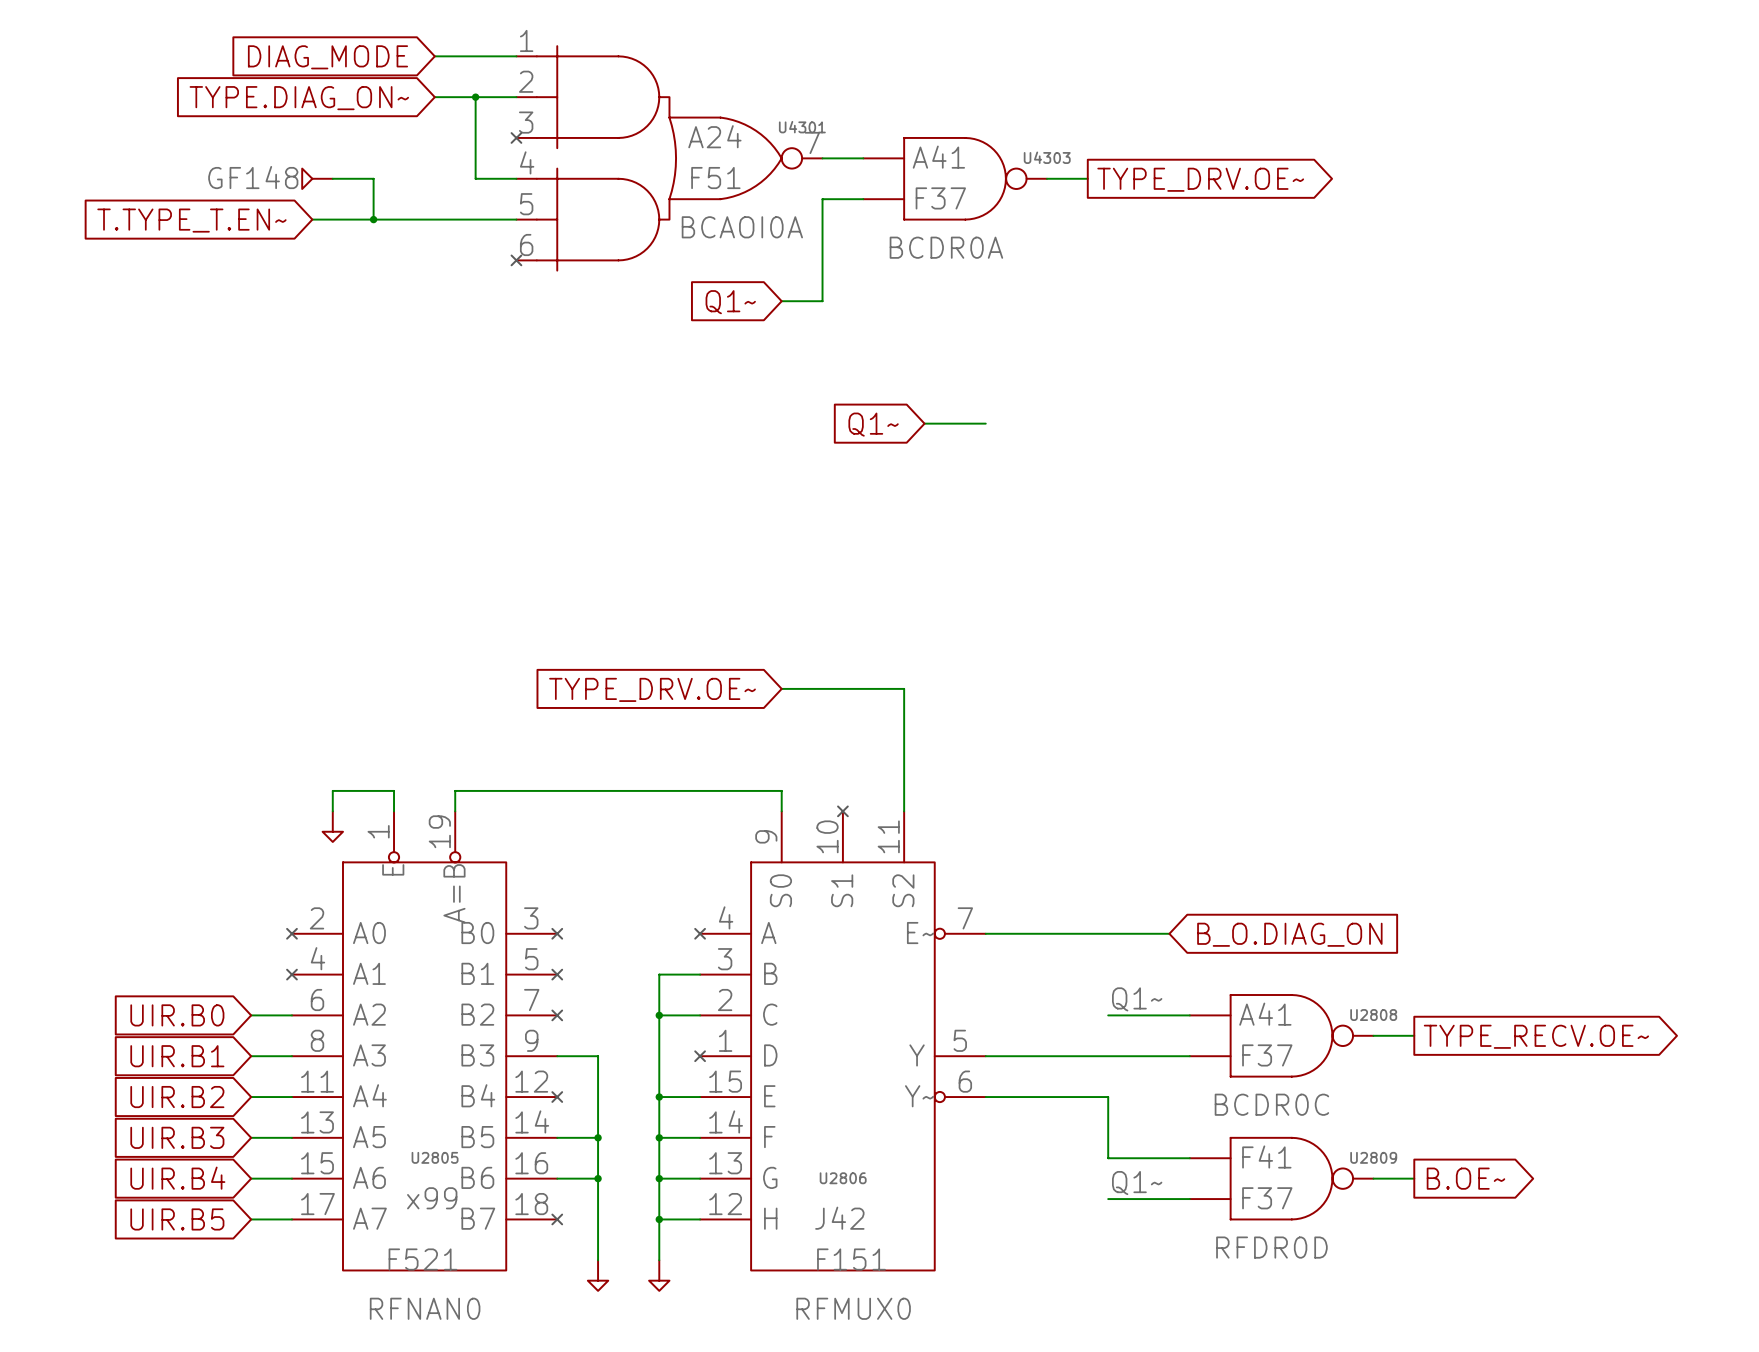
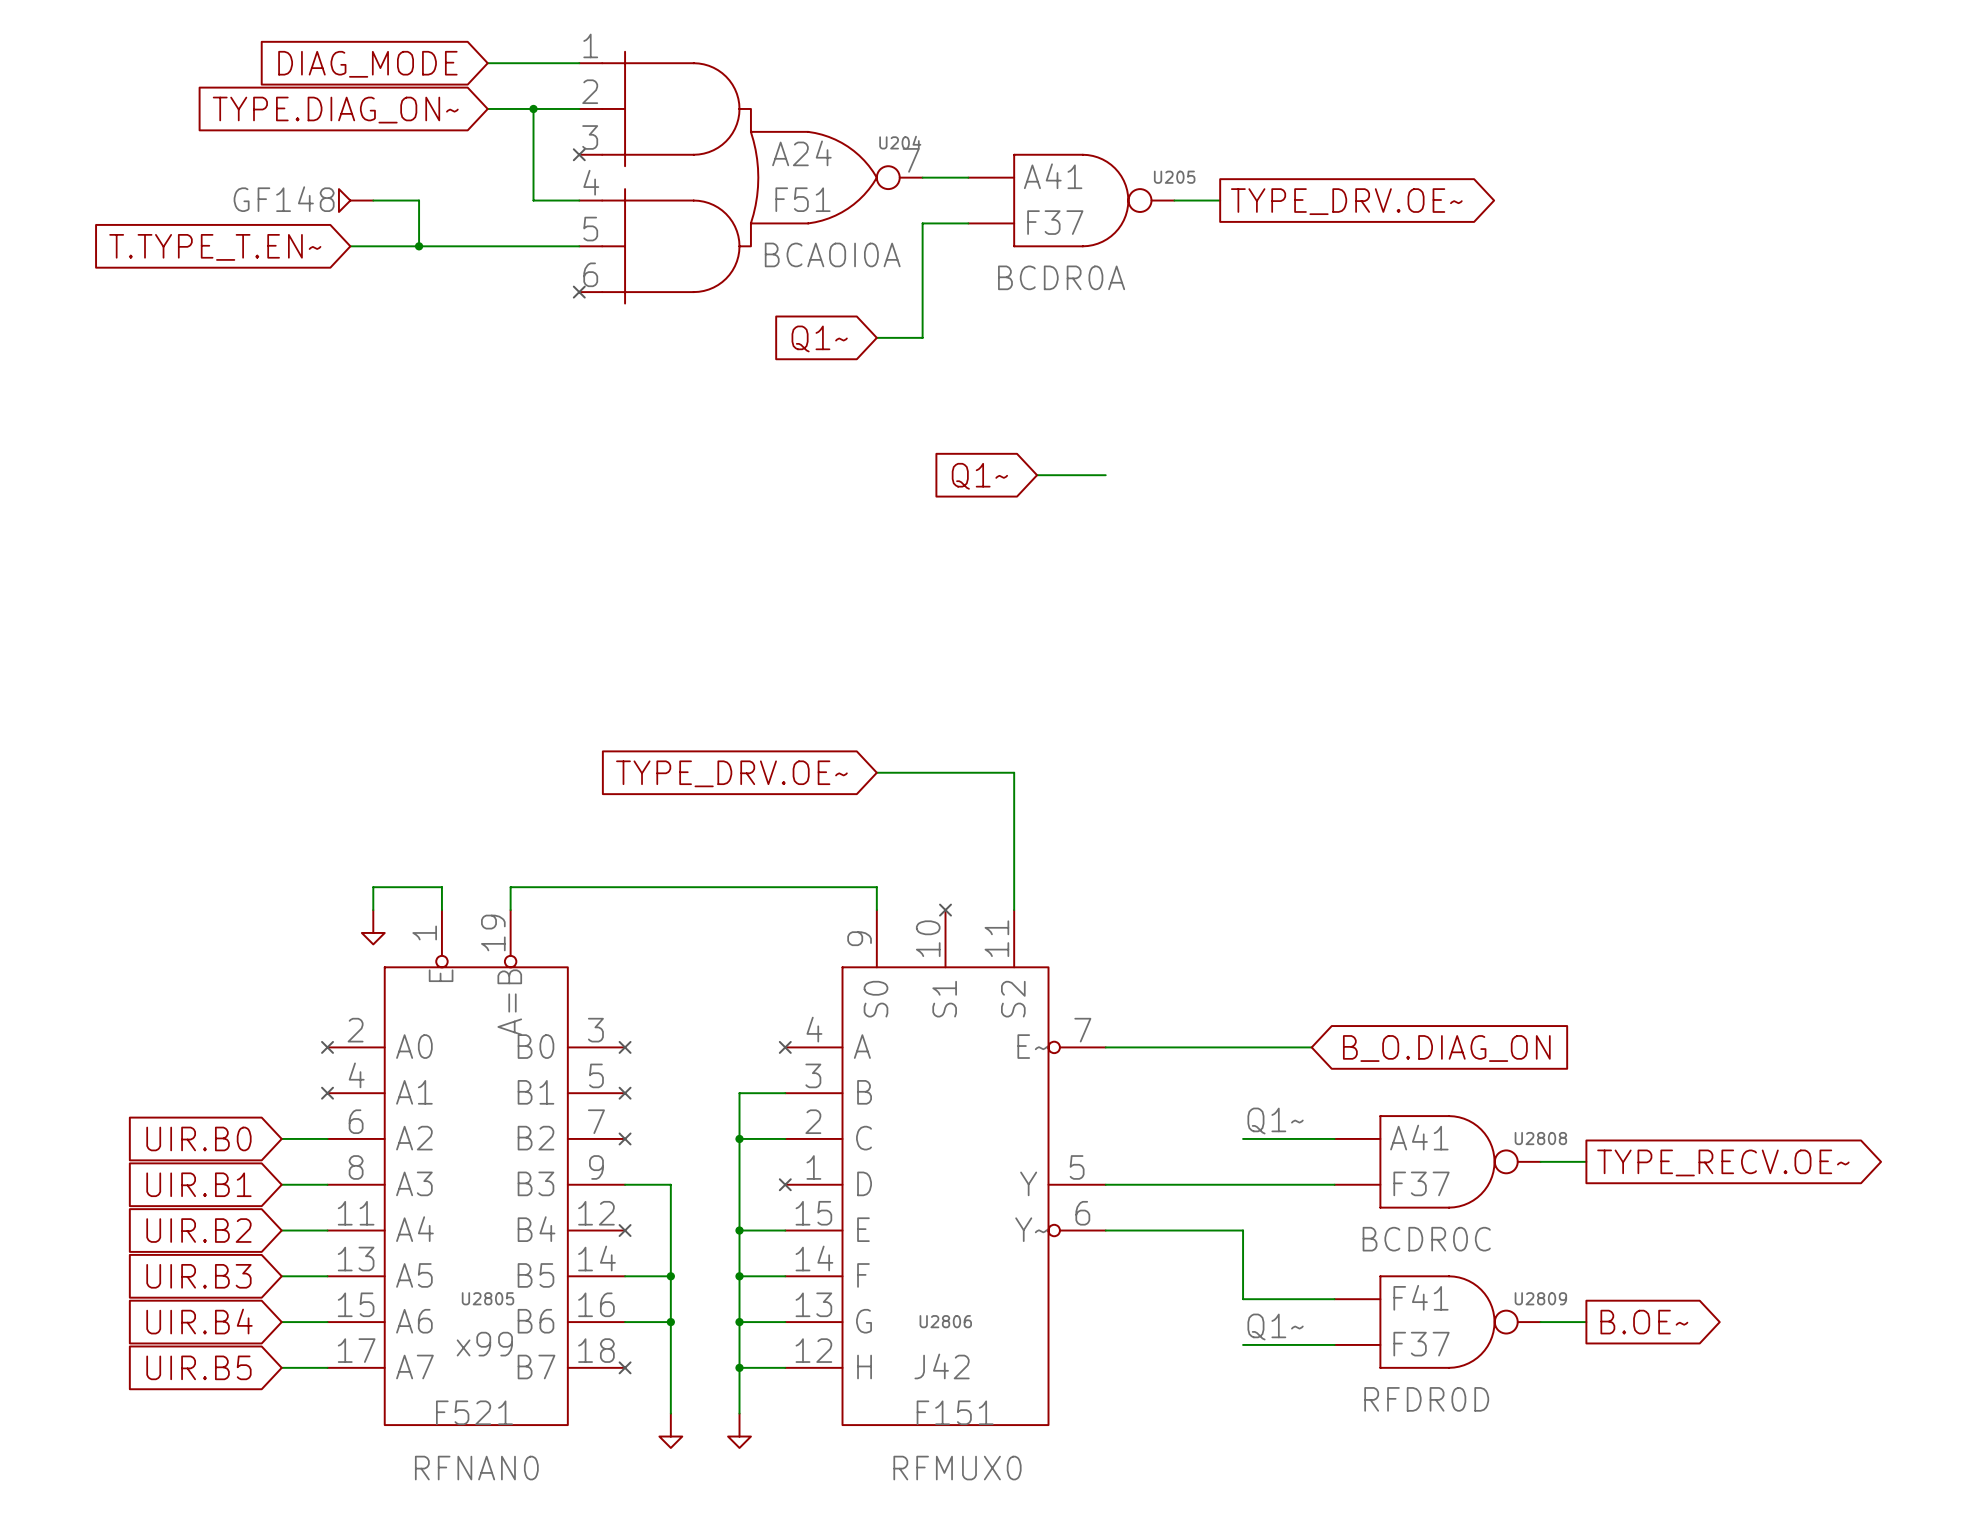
U4301 name: U4301 (802, 127) -> U204 (900, 142)
U4303 name: U4303 (1047, 157) -> U205 (1174, 177)

